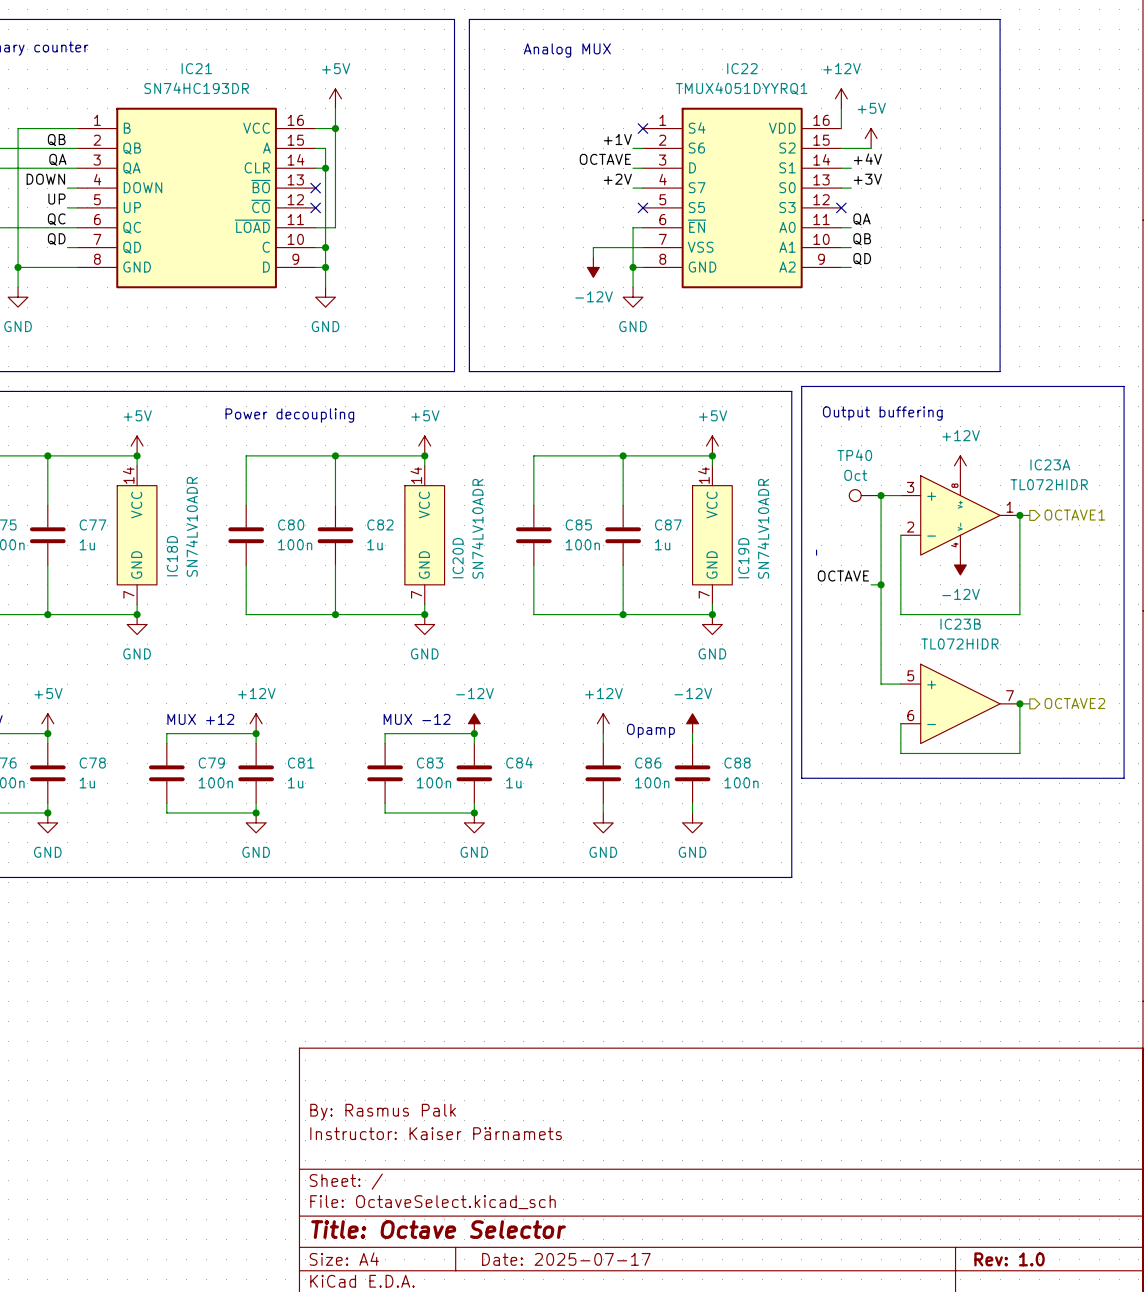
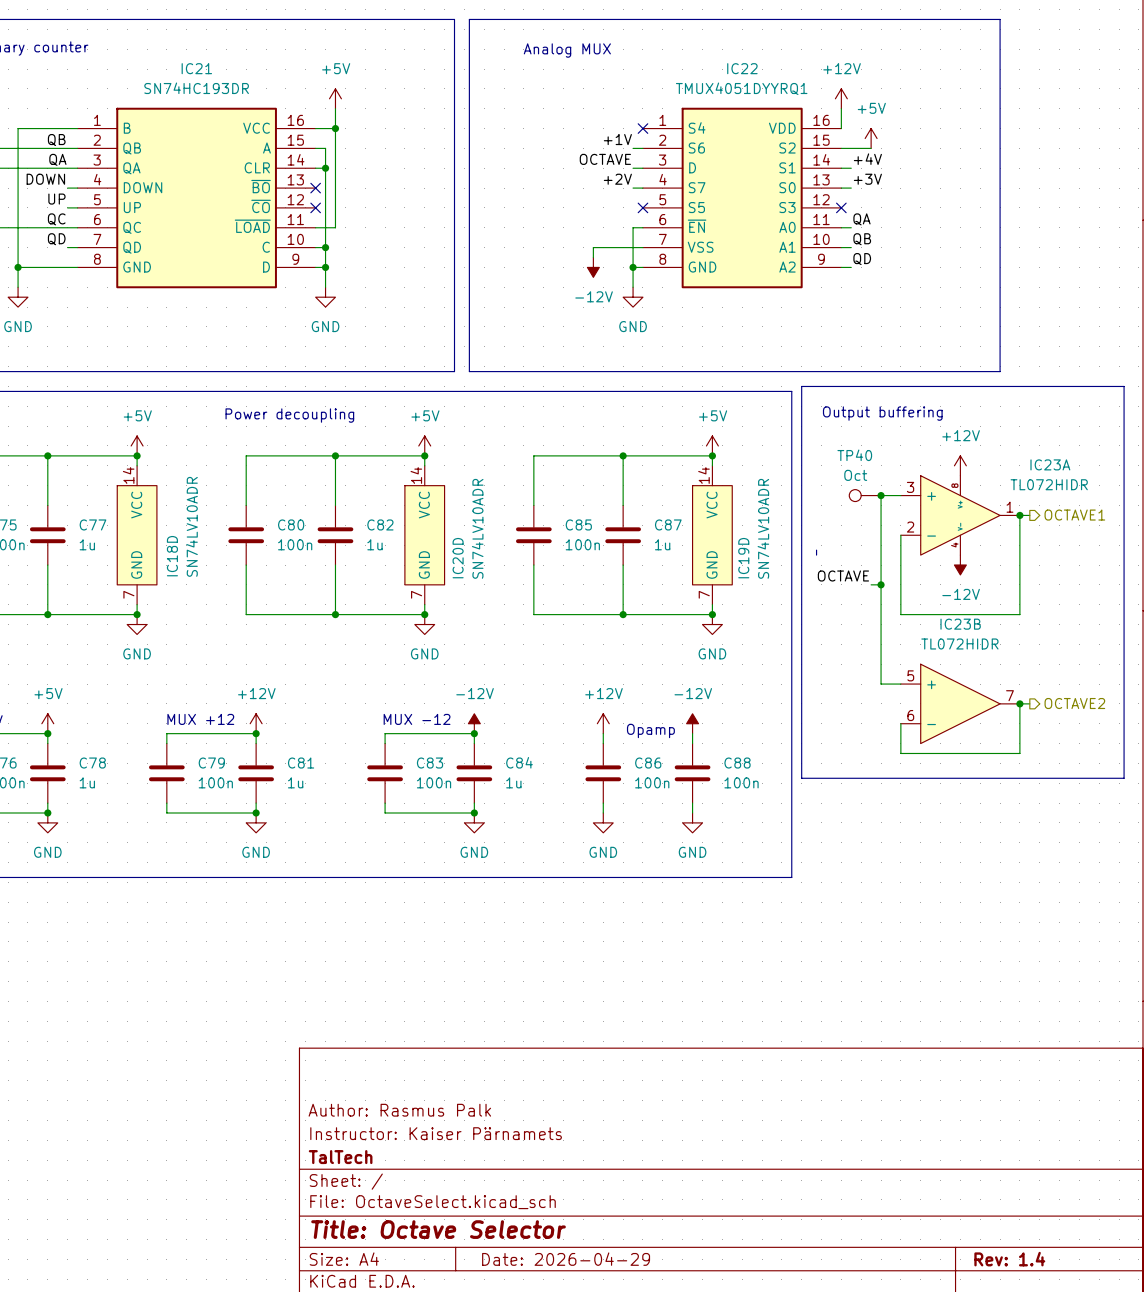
title block: By: Rasmus Palk (383, 1112) -> Author: Rasmus Palk (399, 1110)
title block: none -> TalTech (340, 1157)
title block: Date: 2025-07-17 (566, 1259) -> Date: 2026-04-29 (566, 1259)
title block: Rev: 1.0 (1009, 1259) -> Rev: 1.4 (1009, 1259)

